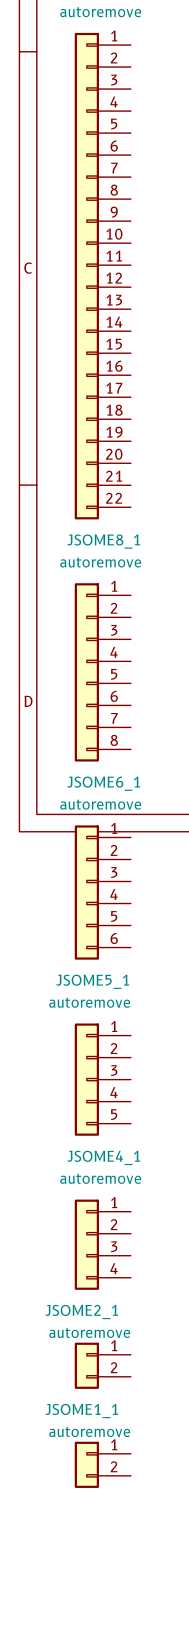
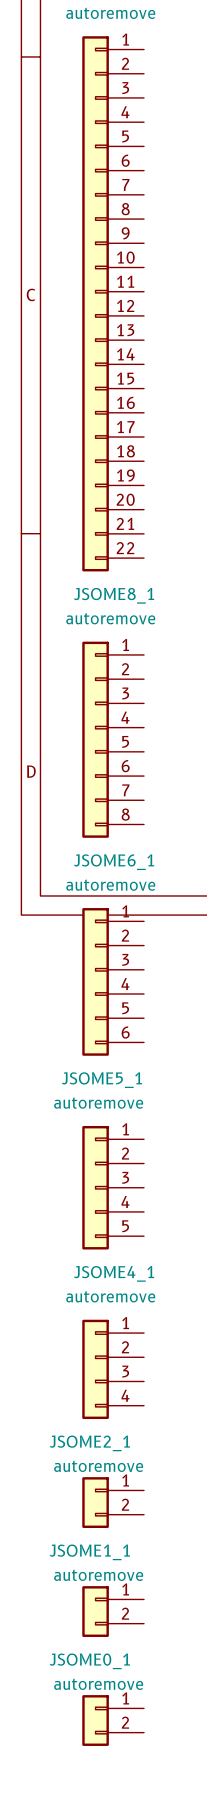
JSOME0_1: none -> autoremove (113, 1720)

